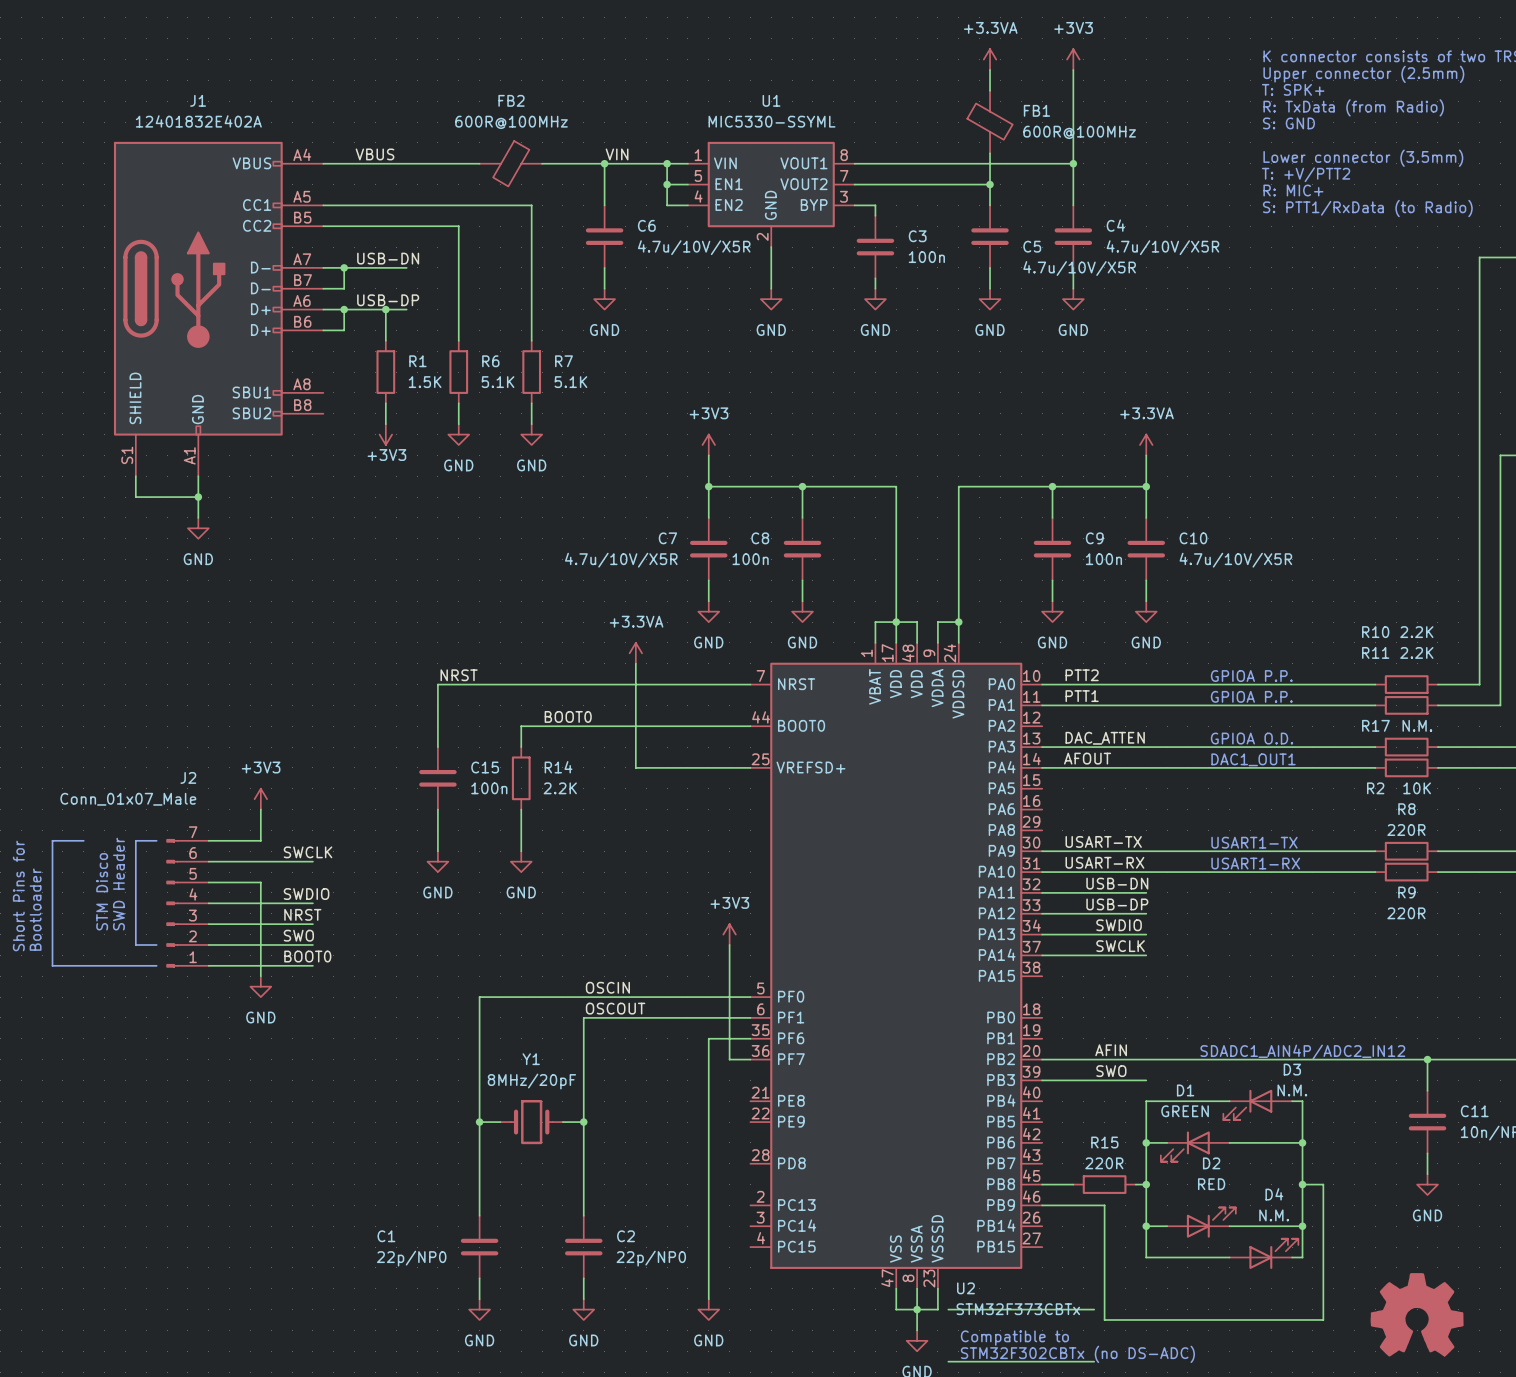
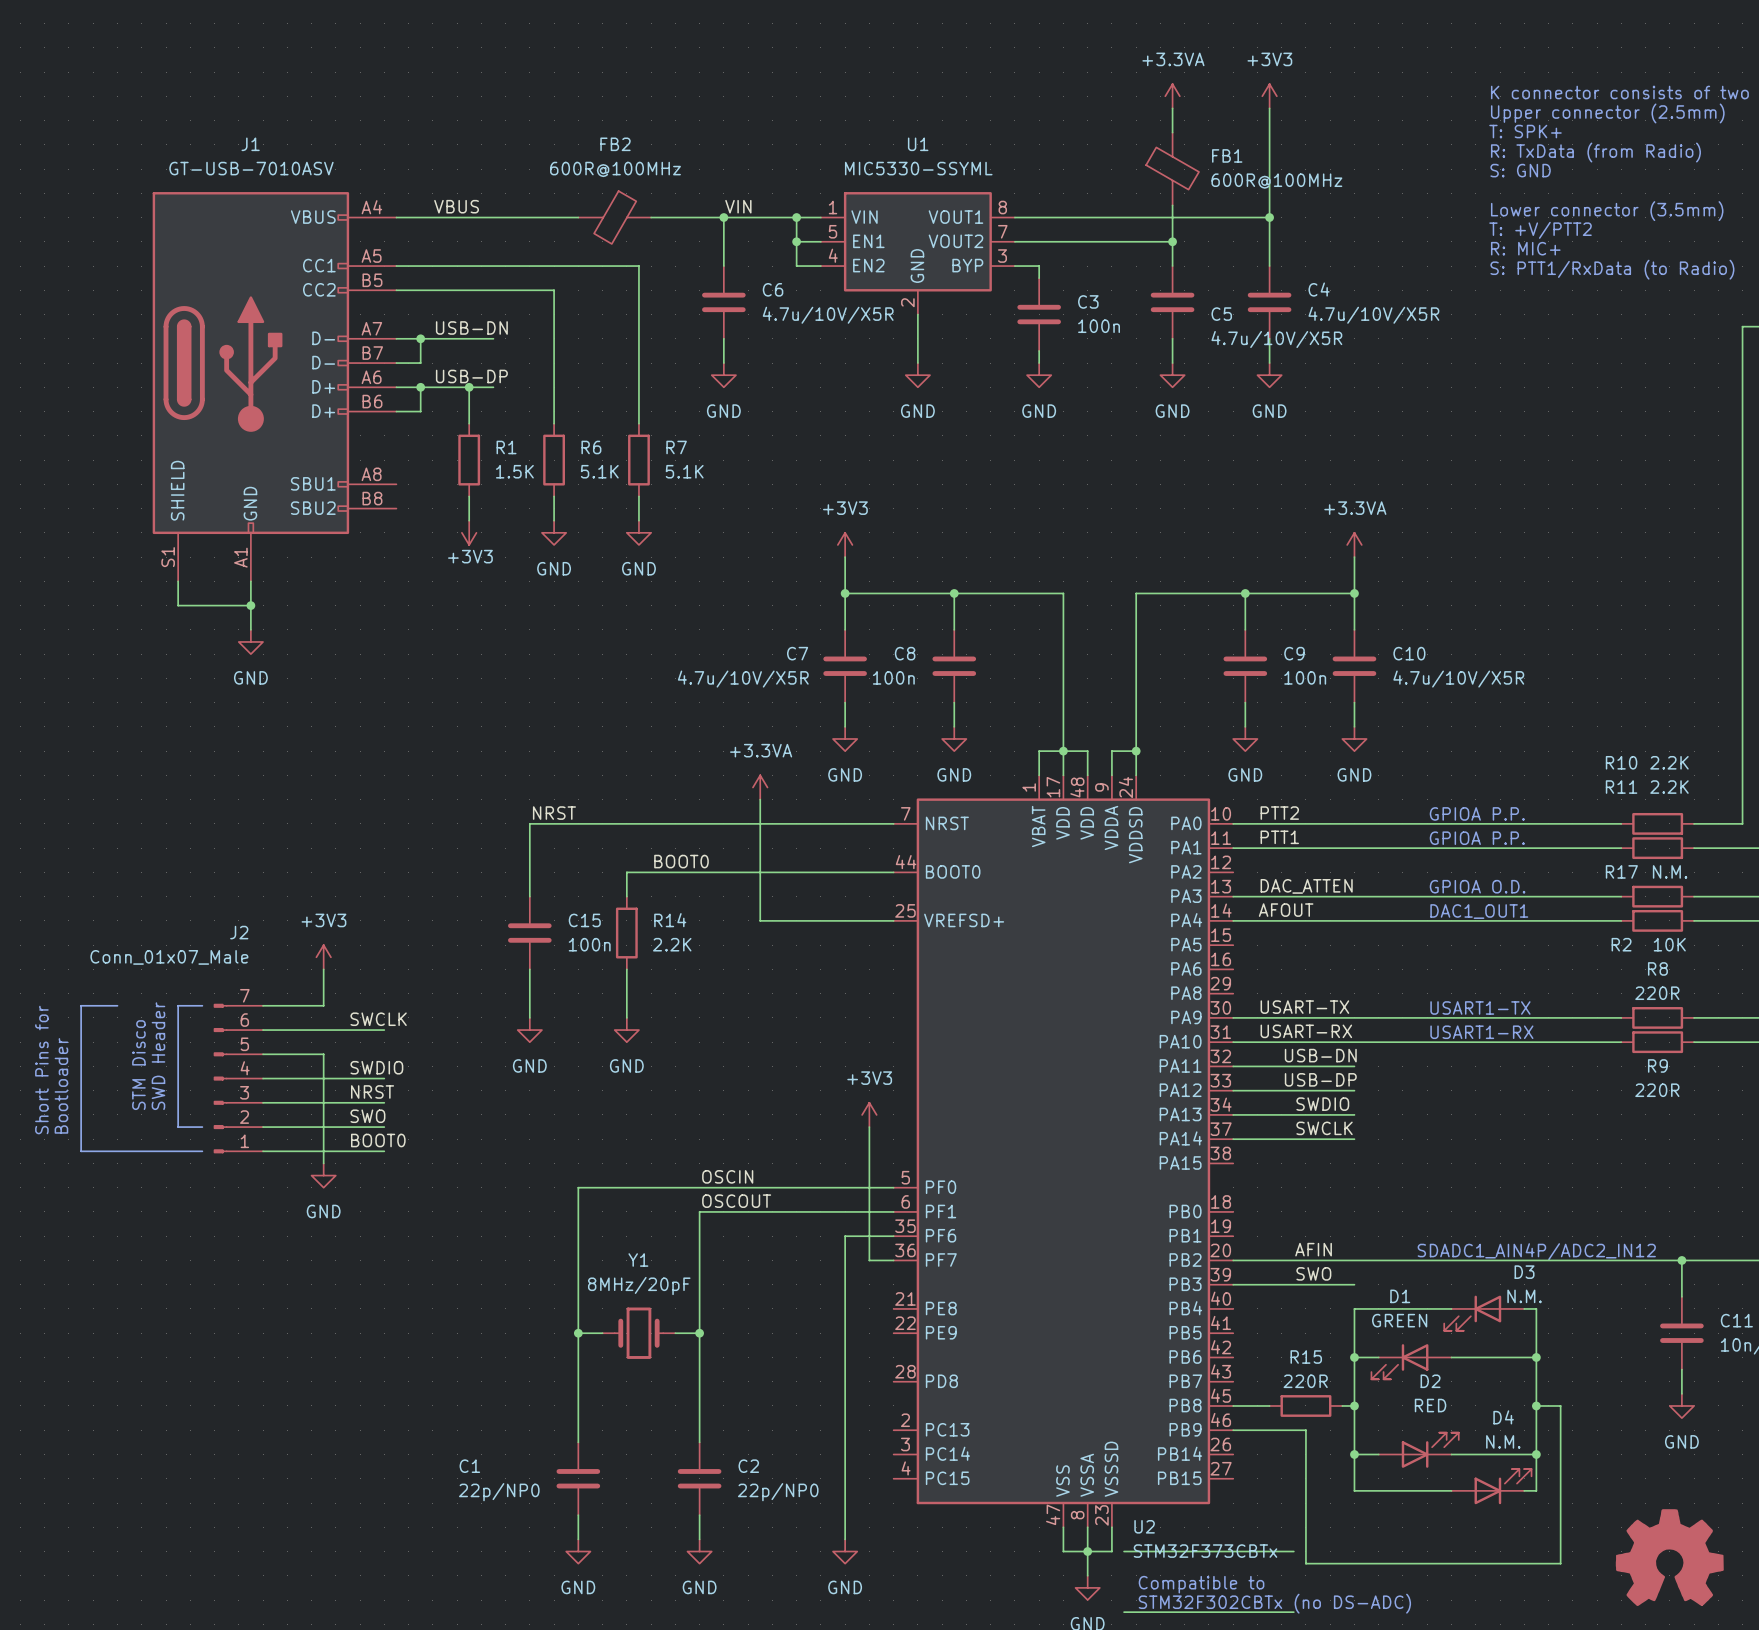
J1 value: 12401832E402A (198, 121) -> GT-USB-7010ASV (251, 168)

